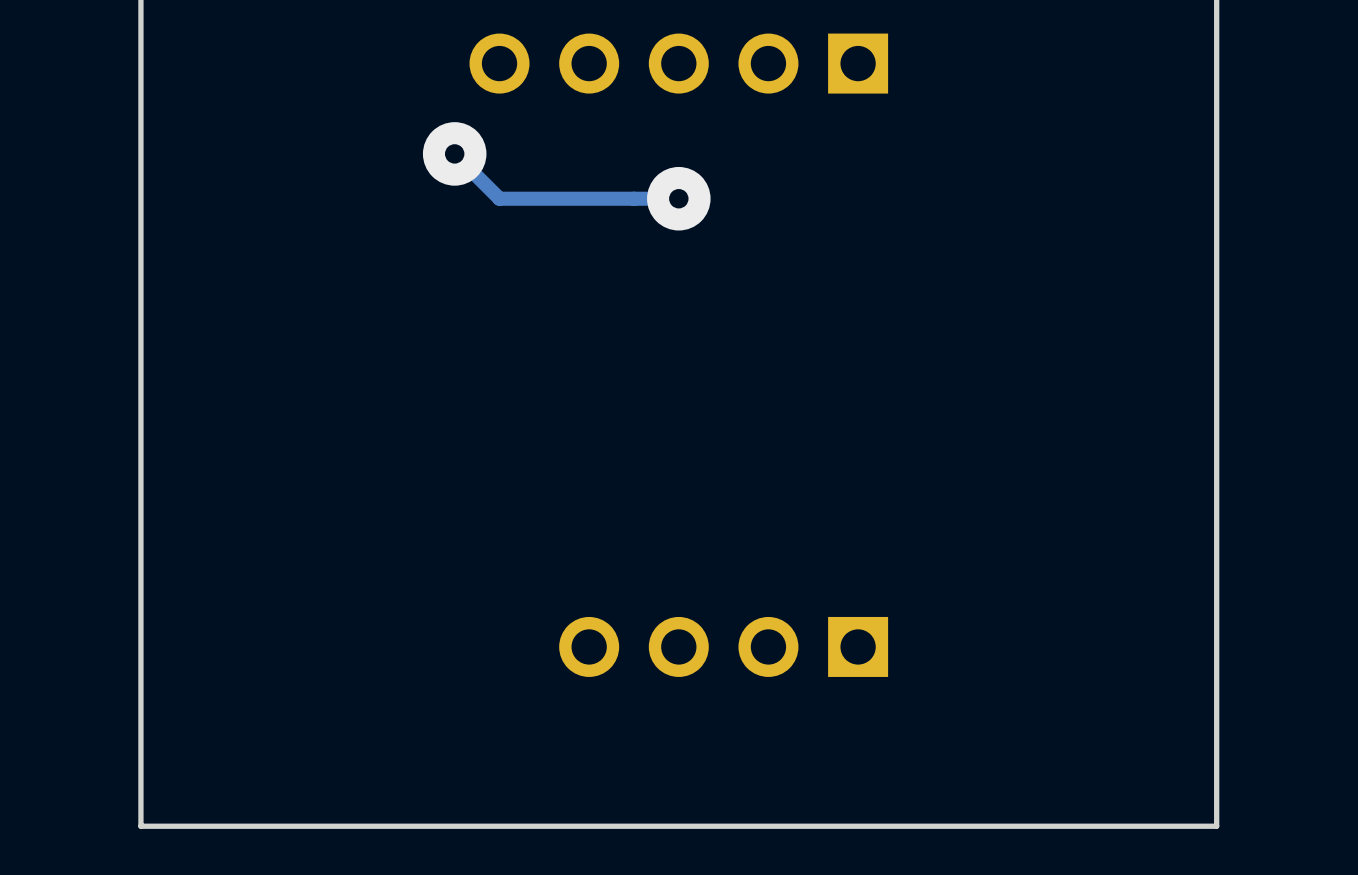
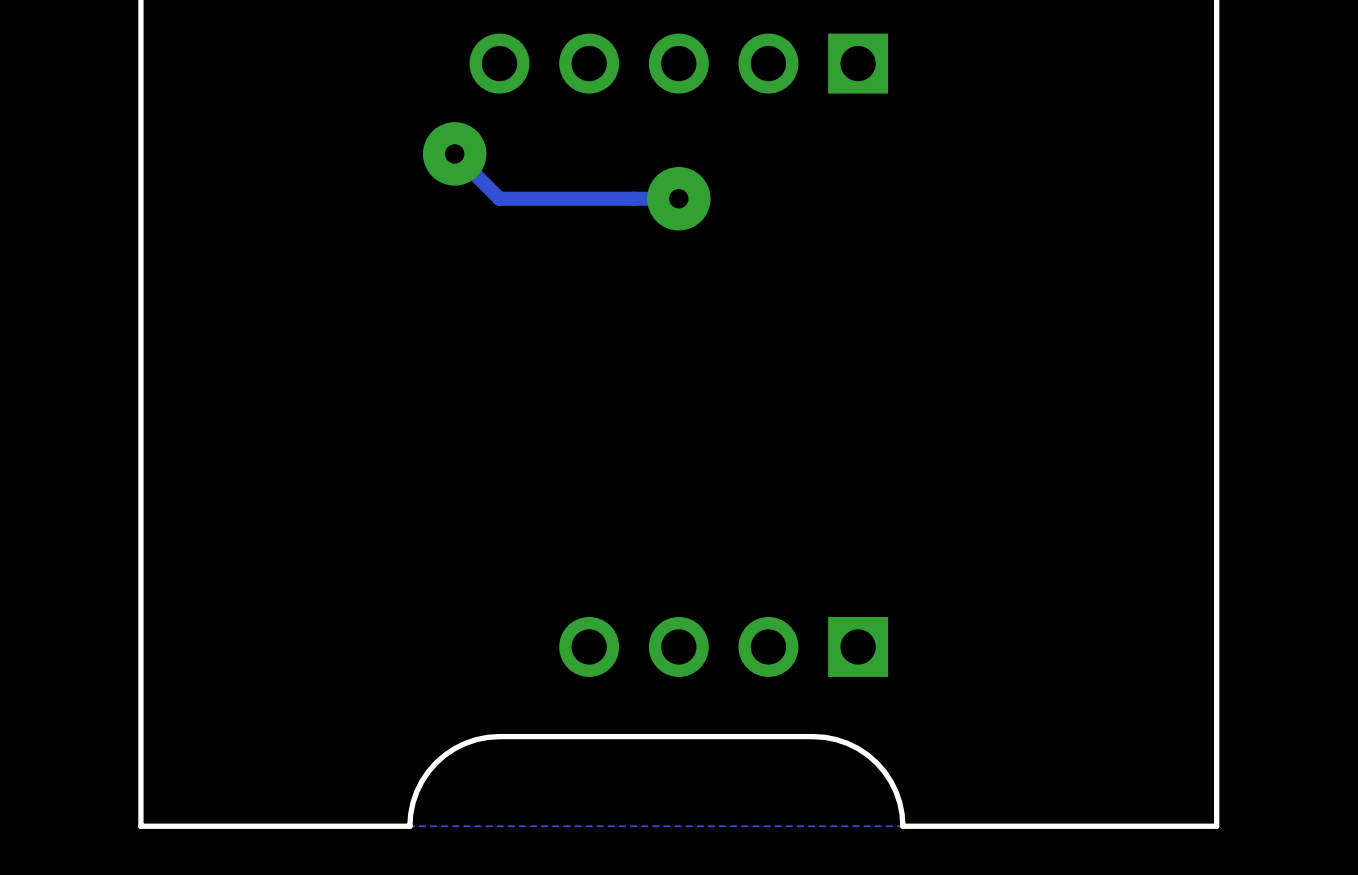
board edge: (902, 826) (409, 826) -> (902, 826) (902, 814) (896, 791) (890, 781) (876, 762) (858, 748) (847, 743) (824, 737) (813, 736) (499, 736) (476, 739) (454, 748) (436, 762) (428, 771) (421, 781) (412, 803) (409, 826)

